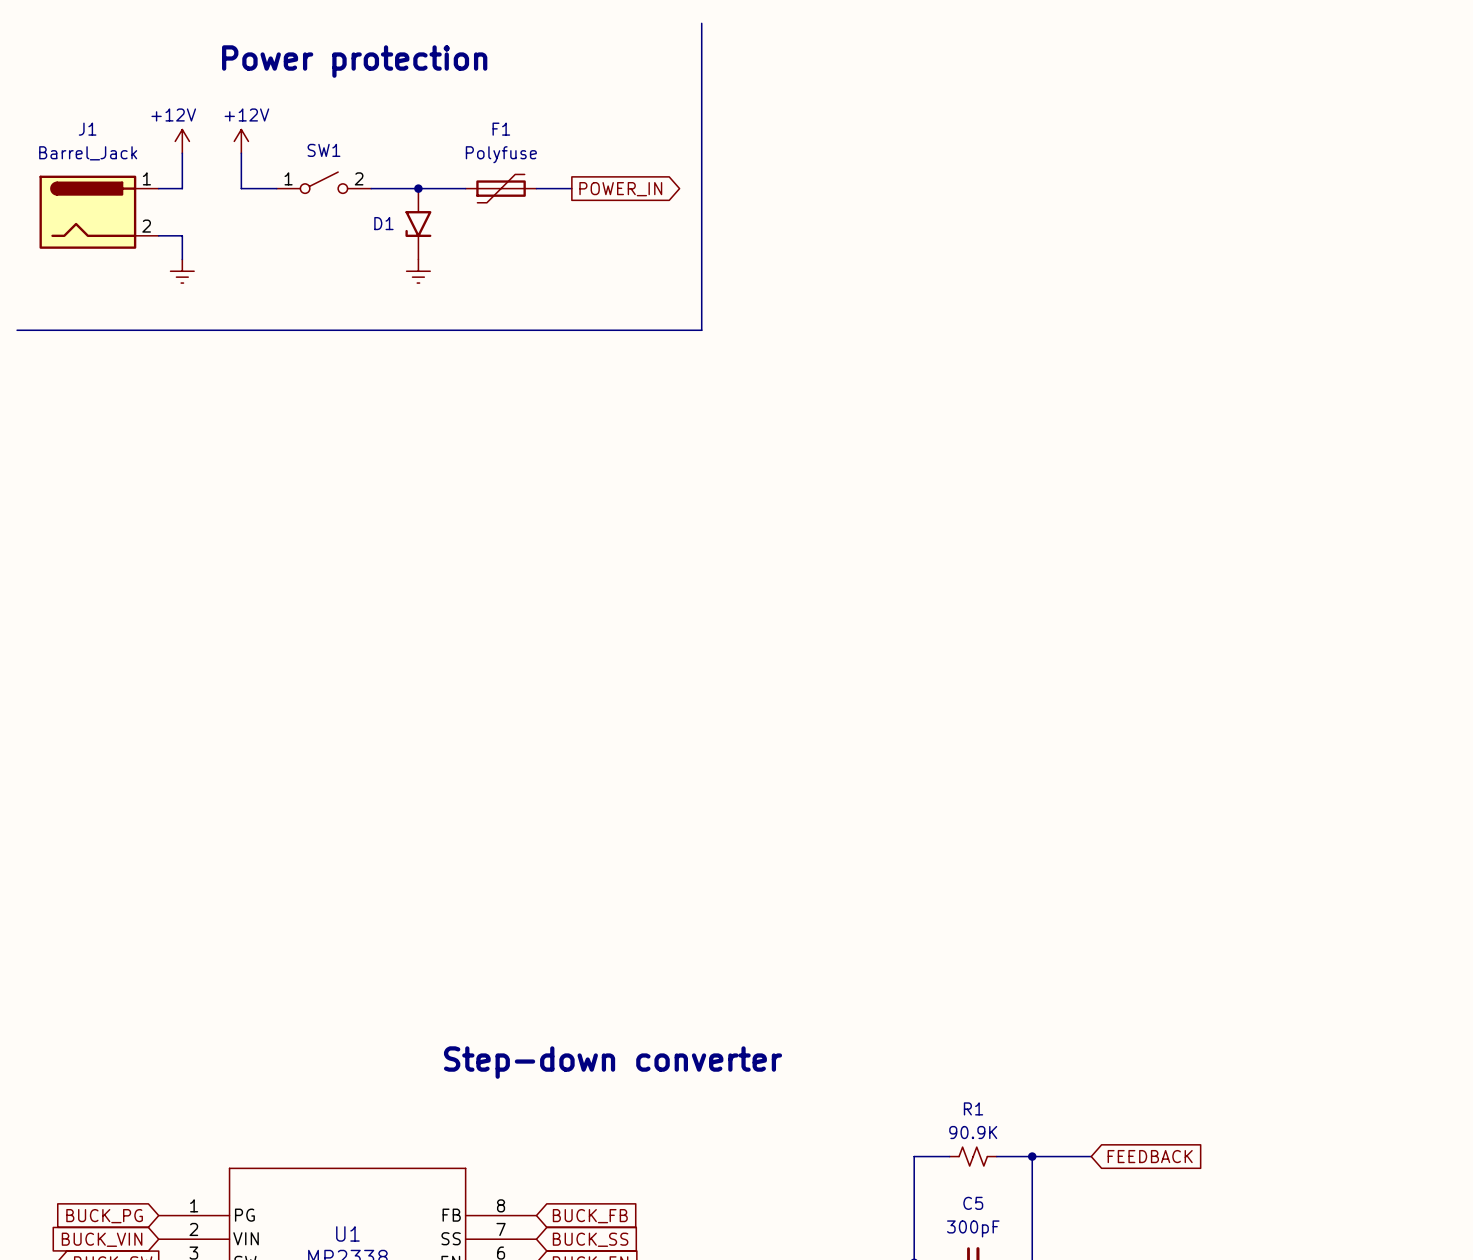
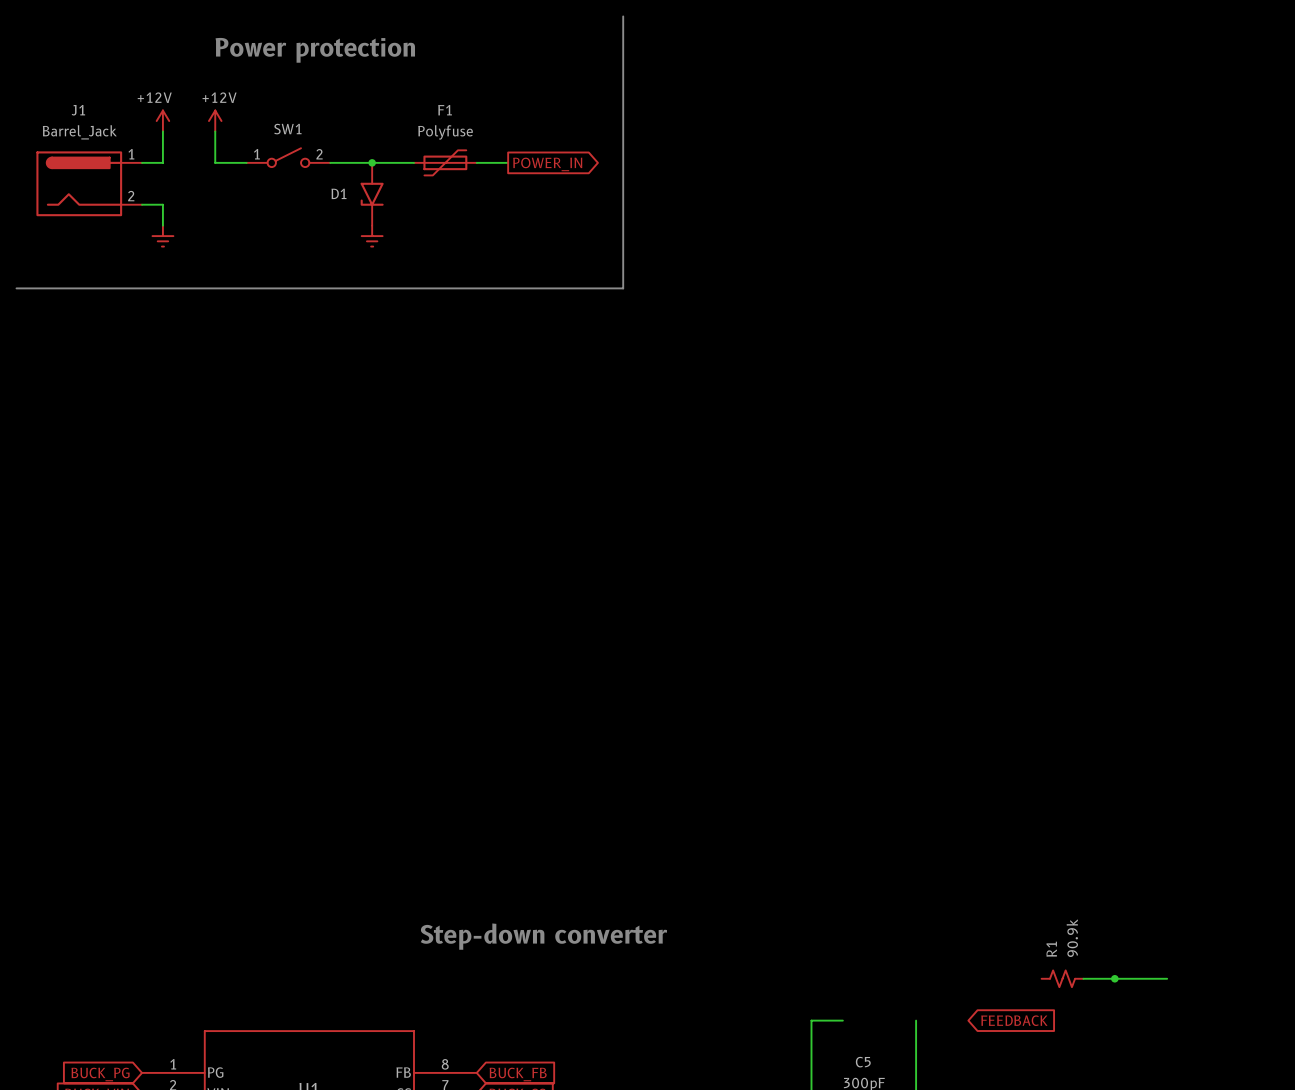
R1 name rotation: 0° (973, 1108) -> 90° counterclockwise (1051, 949)
junction: none -> (1114, 978)
R1 value: 90.9K (973, 1132) -> 90.9k (1072, 938)
R1 position: (973, 1156) -> (1062, 978)
wire: (996, 1156) (1091, 1156) -> (1083, 978) (1167, 978)
junction: (1032, 1156) -> none

